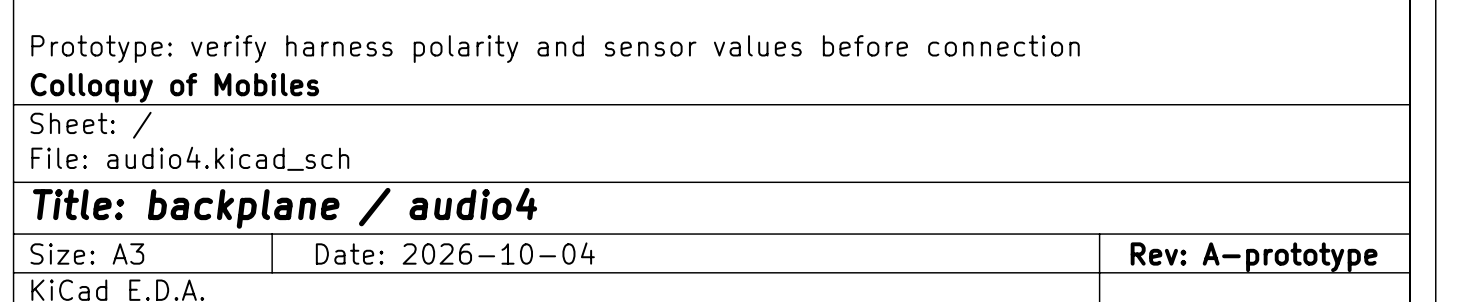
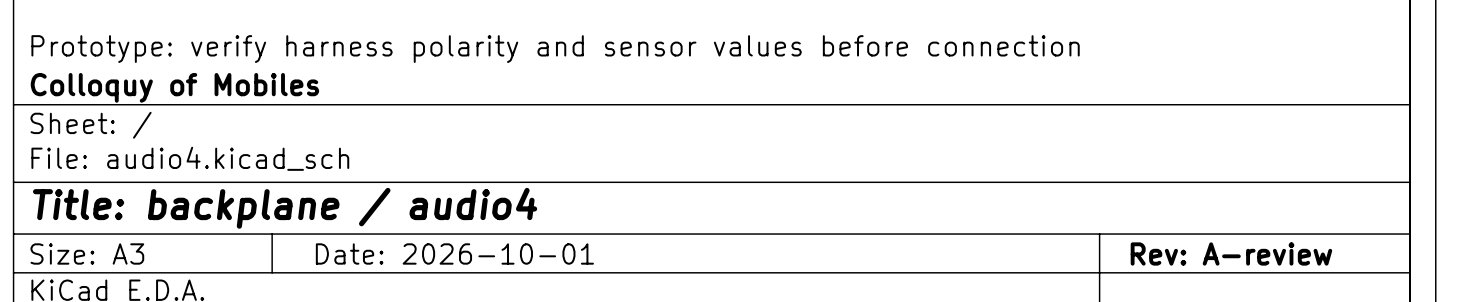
title block: Date: 2026-10-04 (455, 253) -> Date: 2026-10-01 (454, 253)
title block: Rev: A-prototype (1254, 257) -> Rev: A-review (1231, 253)

